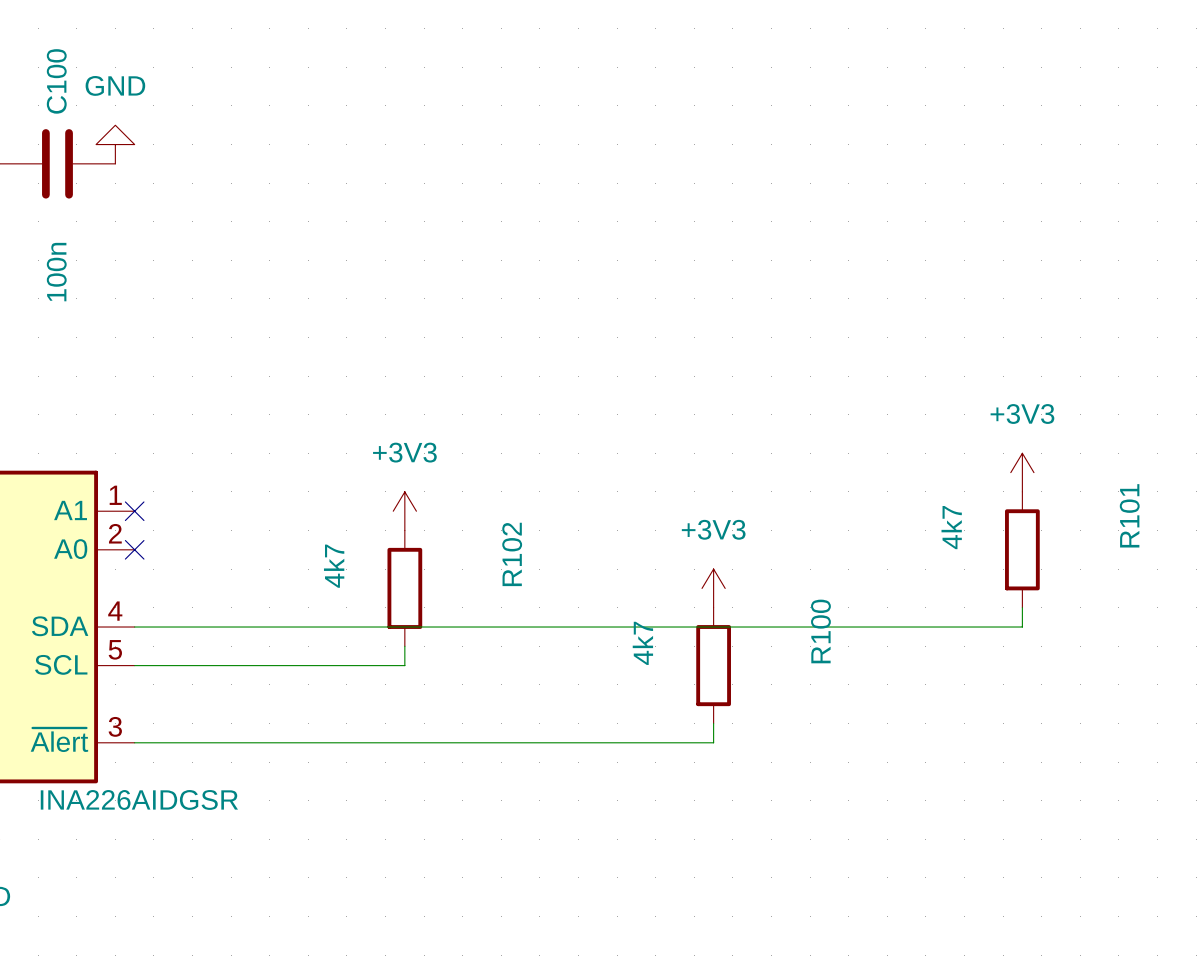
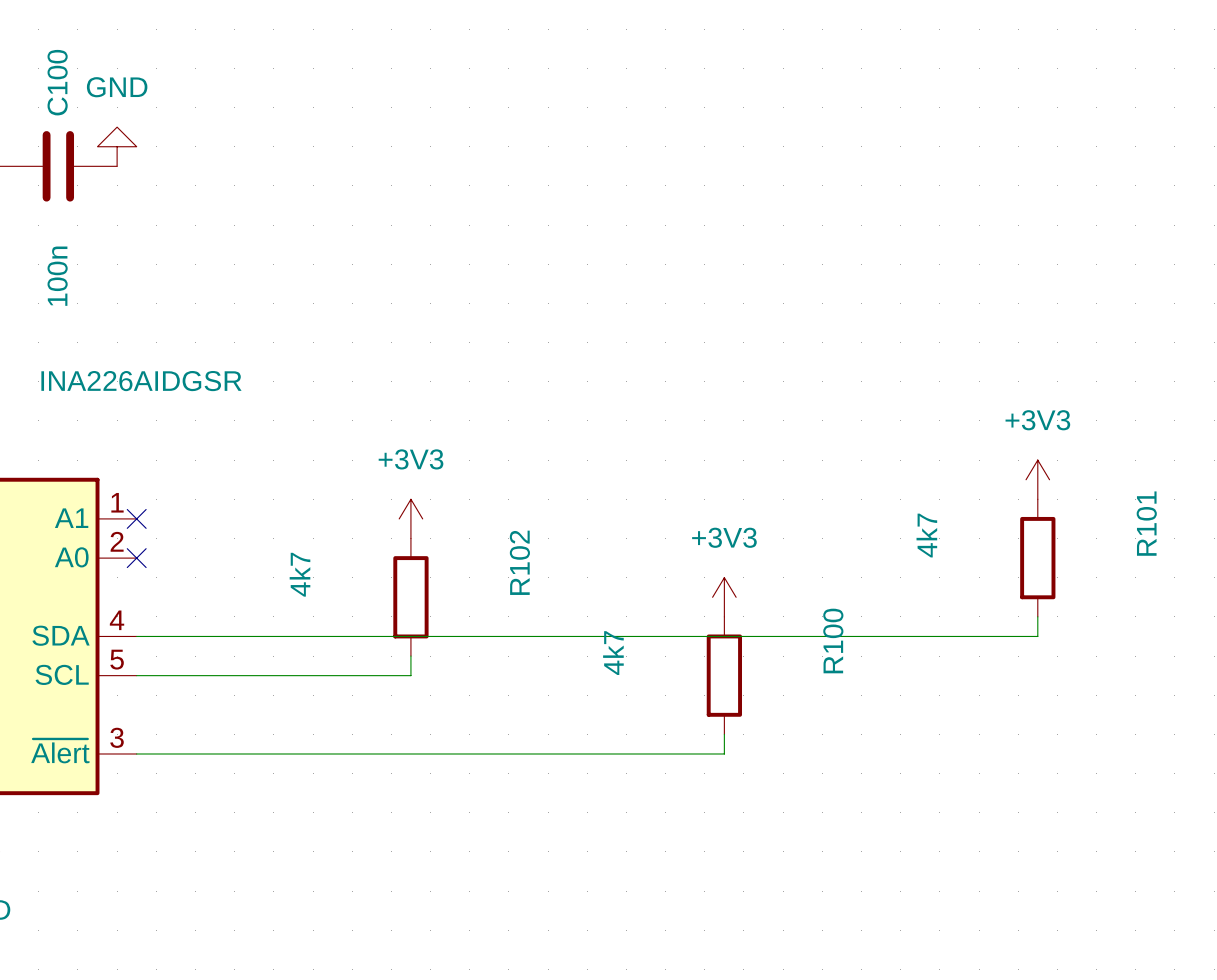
R101 value position: 4k7 (951, 527) -> 4k7 (926, 535)
R102 value position: 4k7 (334, 566) -> 4k7 (299, 574)
R100 value position: 4k7 (642, 643) -> 4k7 (613, 653)
part value position: INA226AIDGSR (139, 799) -> INA226AIDGSR (141, 381)

